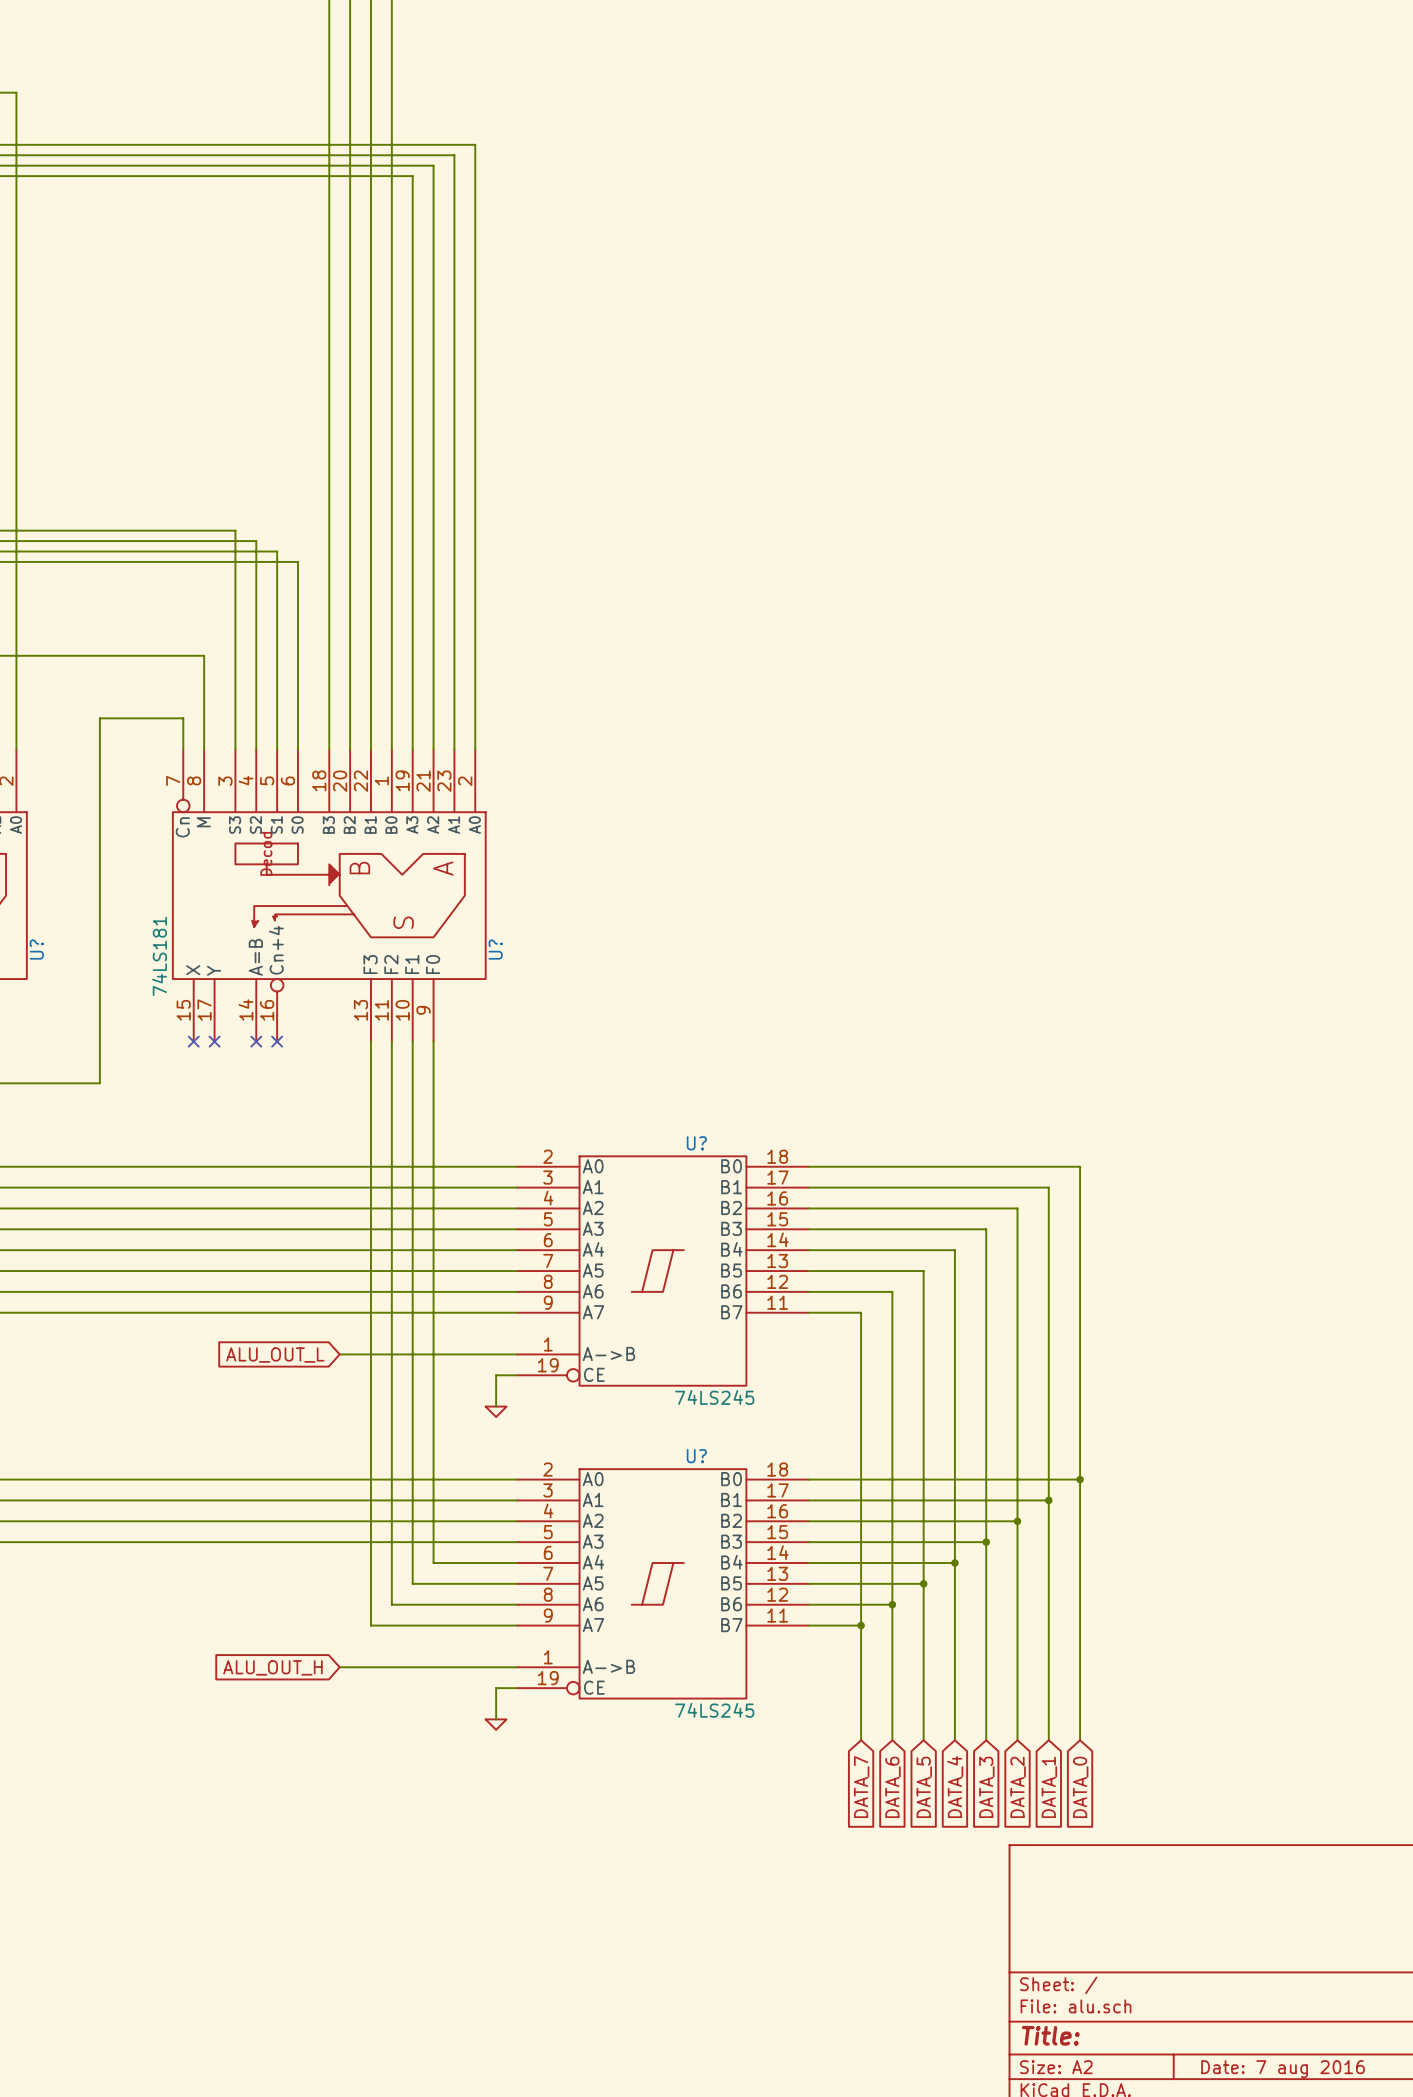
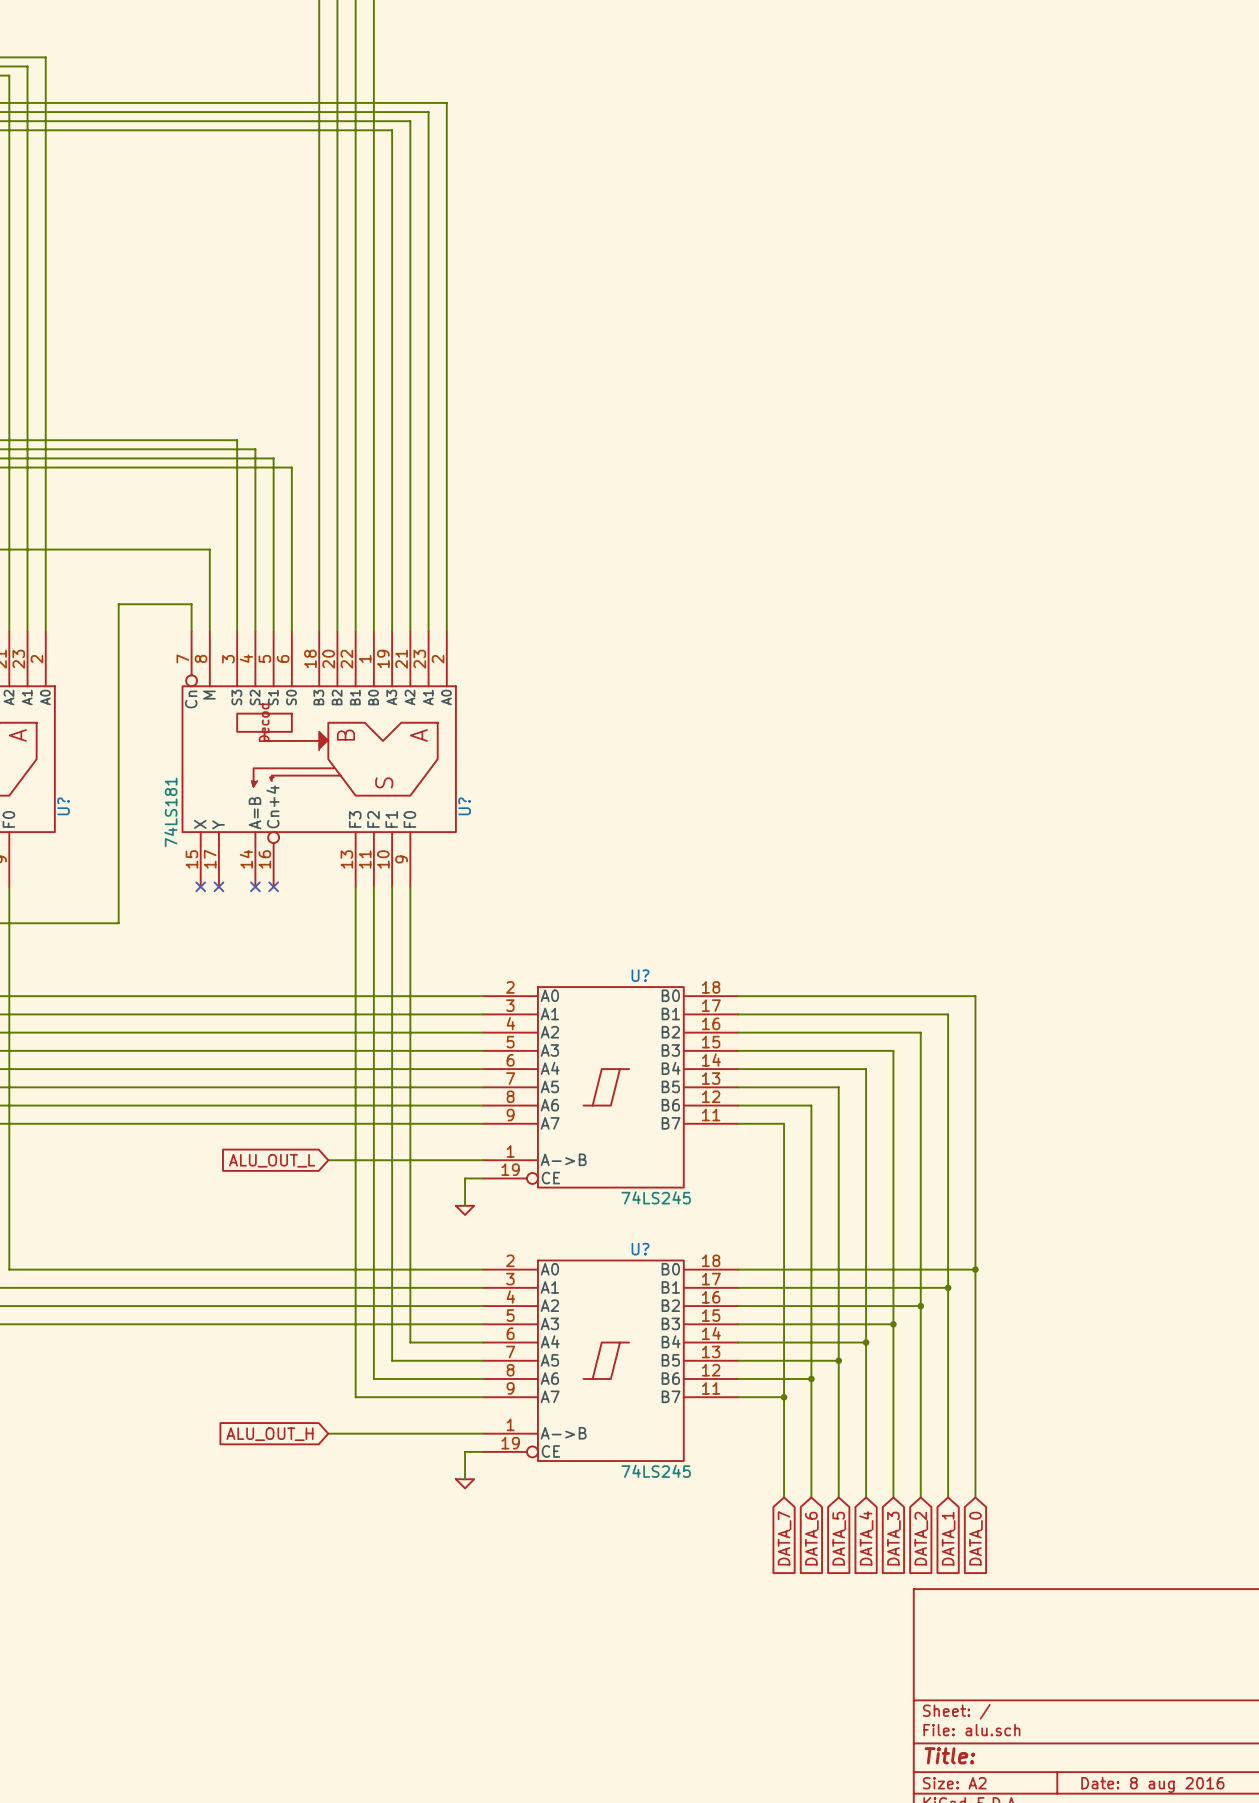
title block: Date: 7 aug 2016 (1283, 2069) -> Date: 8 aug 2016 (1152, 1785)

